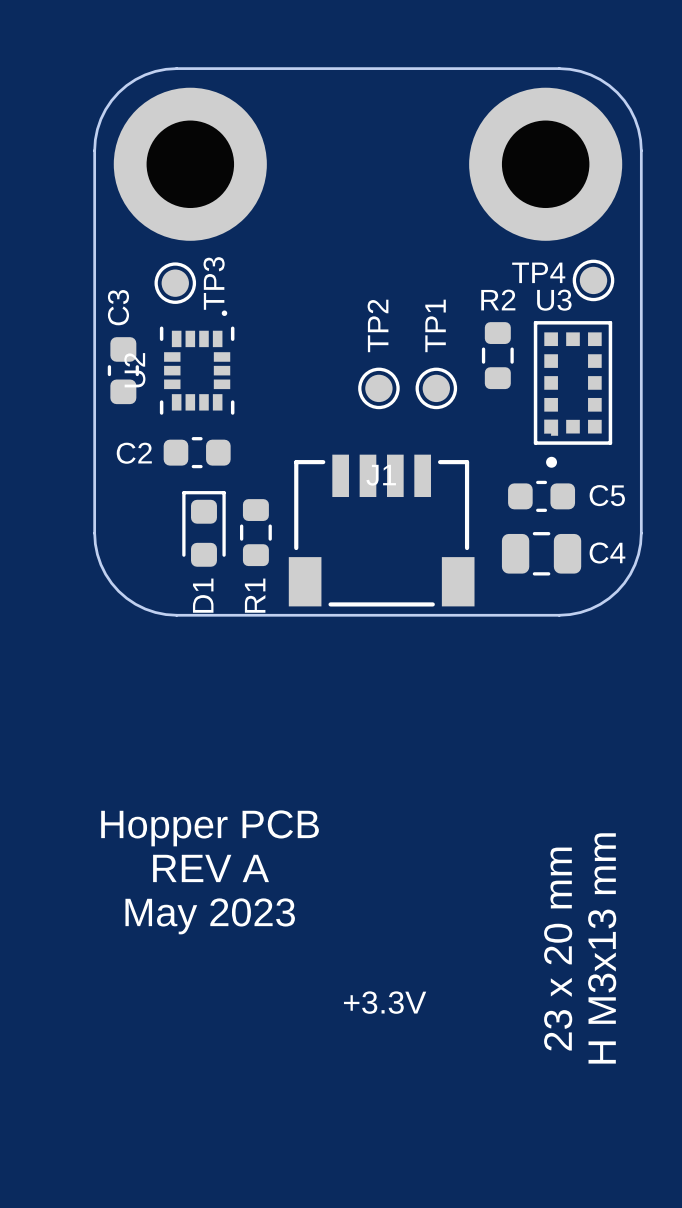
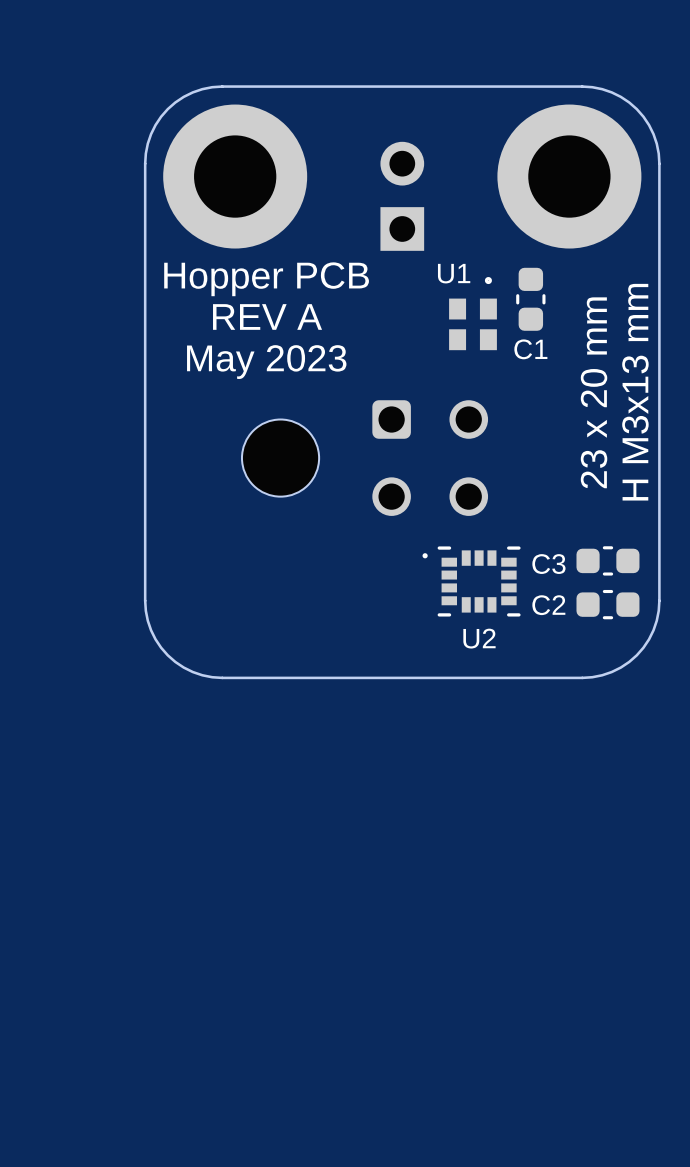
part: none -> (402, 196)
TP4: (593, 280) -> none
TP3: (175, 283) -> none
C1: none -> (530, 299)
C3 name position: C3 (118, 307) -> C3 (548, 564)
U1: none -> (473, 313)
R2: (497, 355) -> none
U2 rotation: 0° (197, 362) -> 90° counterclockwise (471, 581)
U2 position: (197, 362) -> (471, 581)
C3 rotation: 0° (123, 370) -> 90° clockwise (607, 560)
C3 position: (123, 370) -> (607, 560)
TP2: (378, 388) -> none
TP1: (436, 388) -> none
U3: (572, 394) -> none
C2 position: (197, 452) -> (607, 604)
part: none -> (365, 458)
C5: (541, 496) -> none
D1: (203, 528) -> none
part: (381, 530) -> none
R1: (255, 532) -> none
board edge: (94, 533) (100, 564) (118, 591) (145, 609) (176, 615) (570, 614) (600, 604) (624, 583) (638, 554) (641, 533) -> (145, 523) (145, 610) (155, 639) (167, 655) (183, 667) (202, 675) (222, 677) (582, 677) (611, 672) (636, 655) (649, 639) (656, 620) (659, 600) (659, 523)
C4: (541, 553) -> none
text position: Hopper PCB (210, 828) -> Hopper PCB (266, 279)
text position: REV A (211, 868) -> REV A (267, 316)
text position: May 2023 (210, 916) -> May 2023 (266, 362)
text position: H M3x13 mm (602, 948) -> H M3x13 mm (635, 392)
text position: 23 x 20 mm (558, 949) -> 23 x 20 mm (594, 392)
text: +3.3V (385, 1002) -> none

